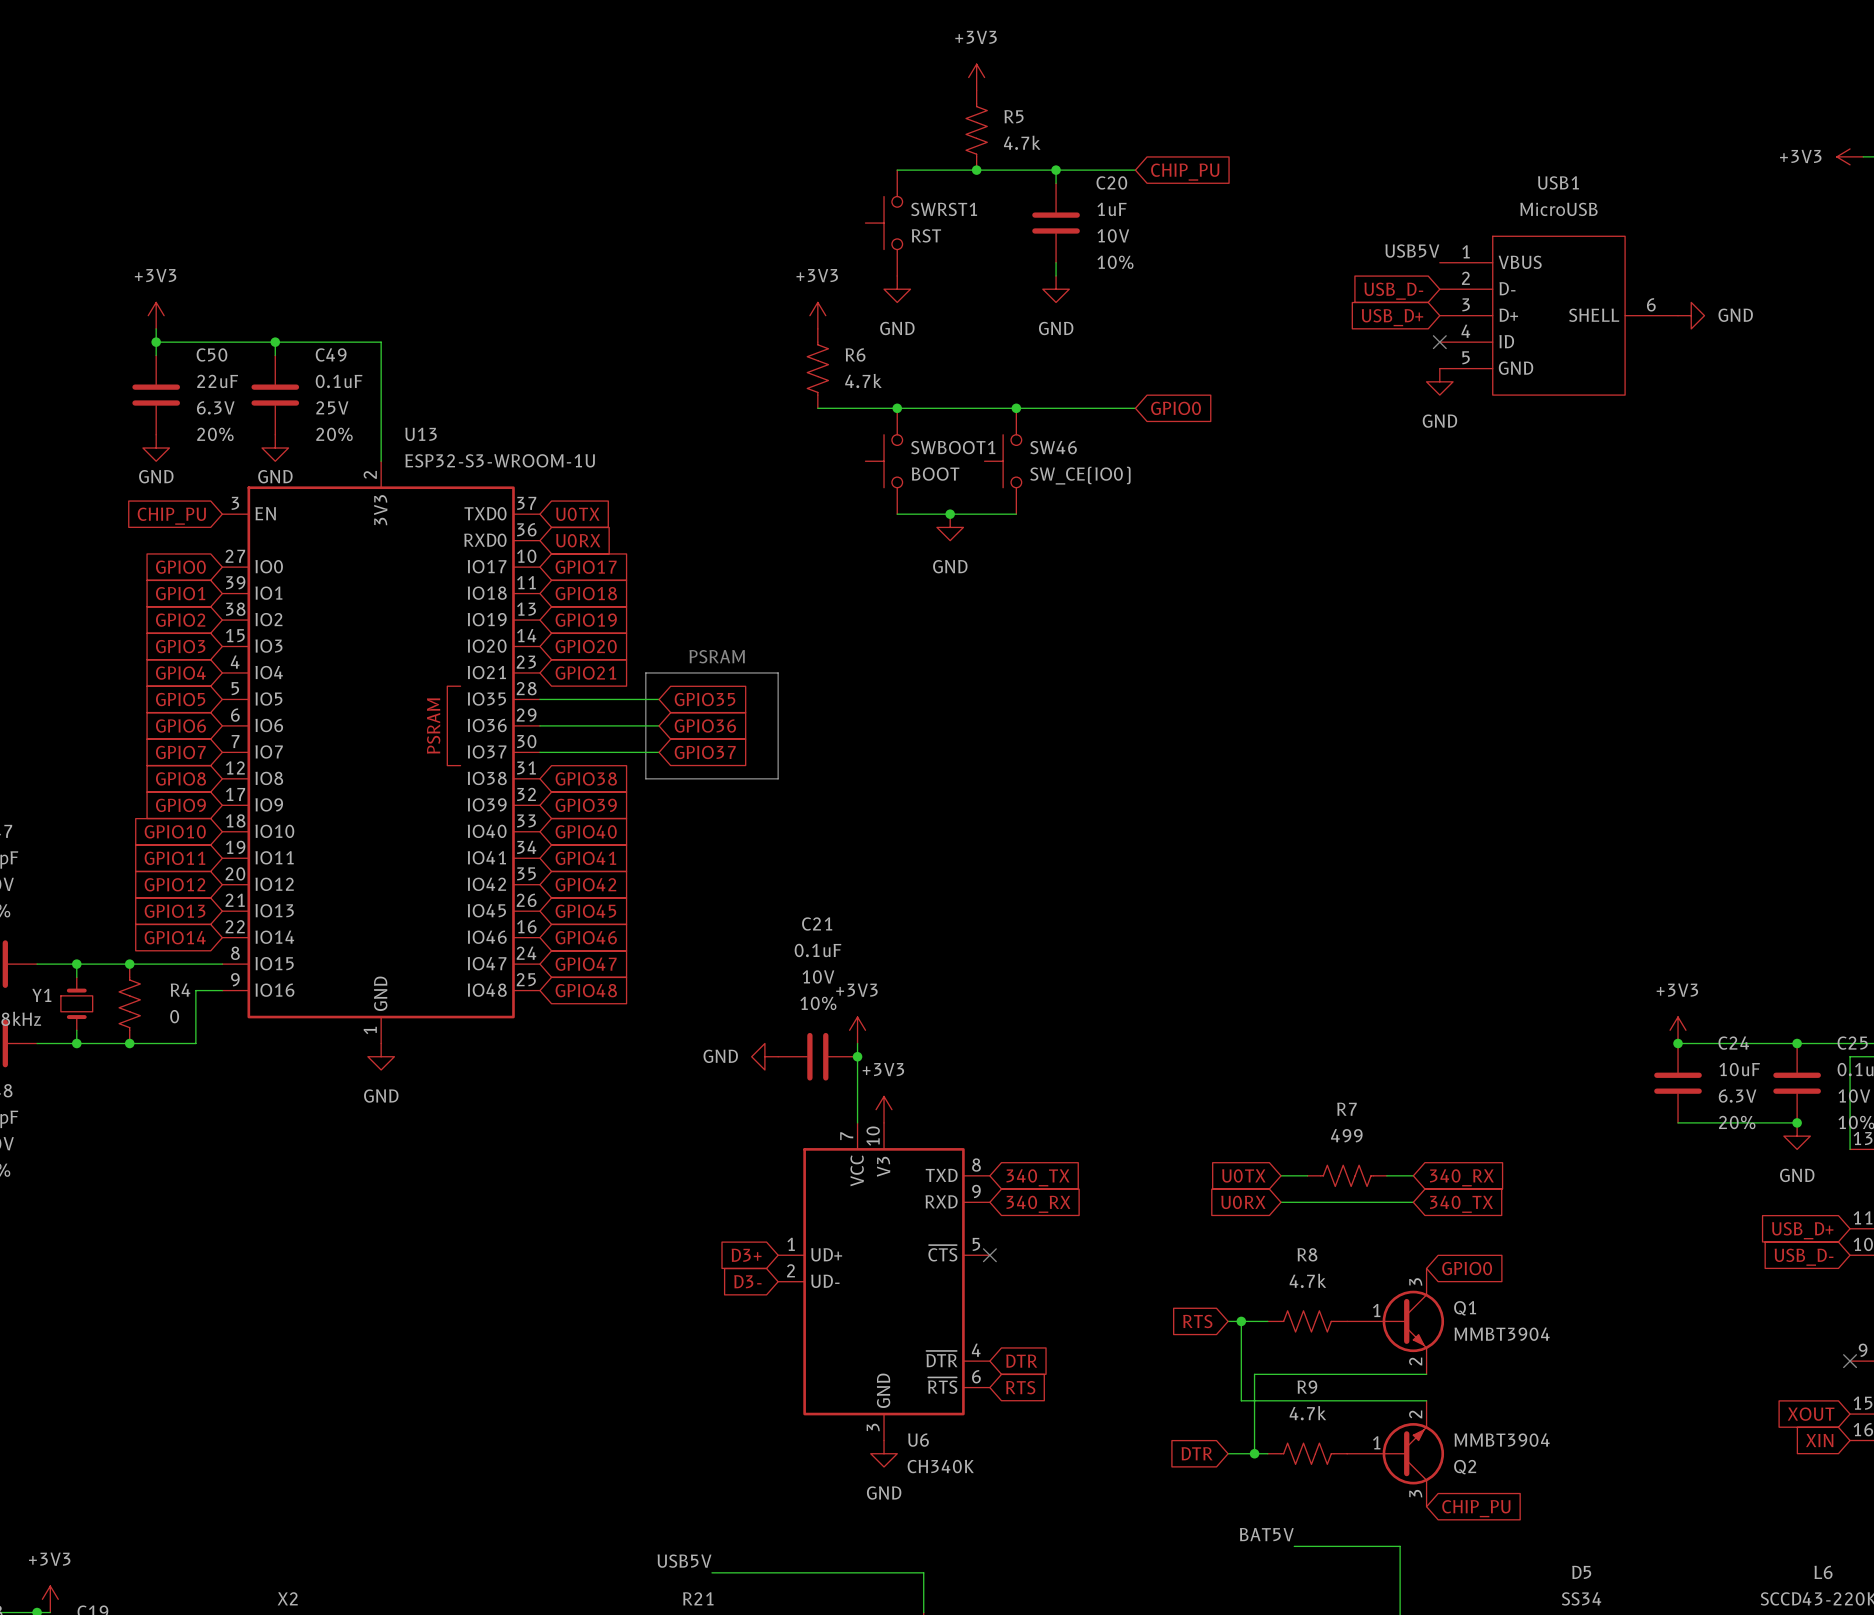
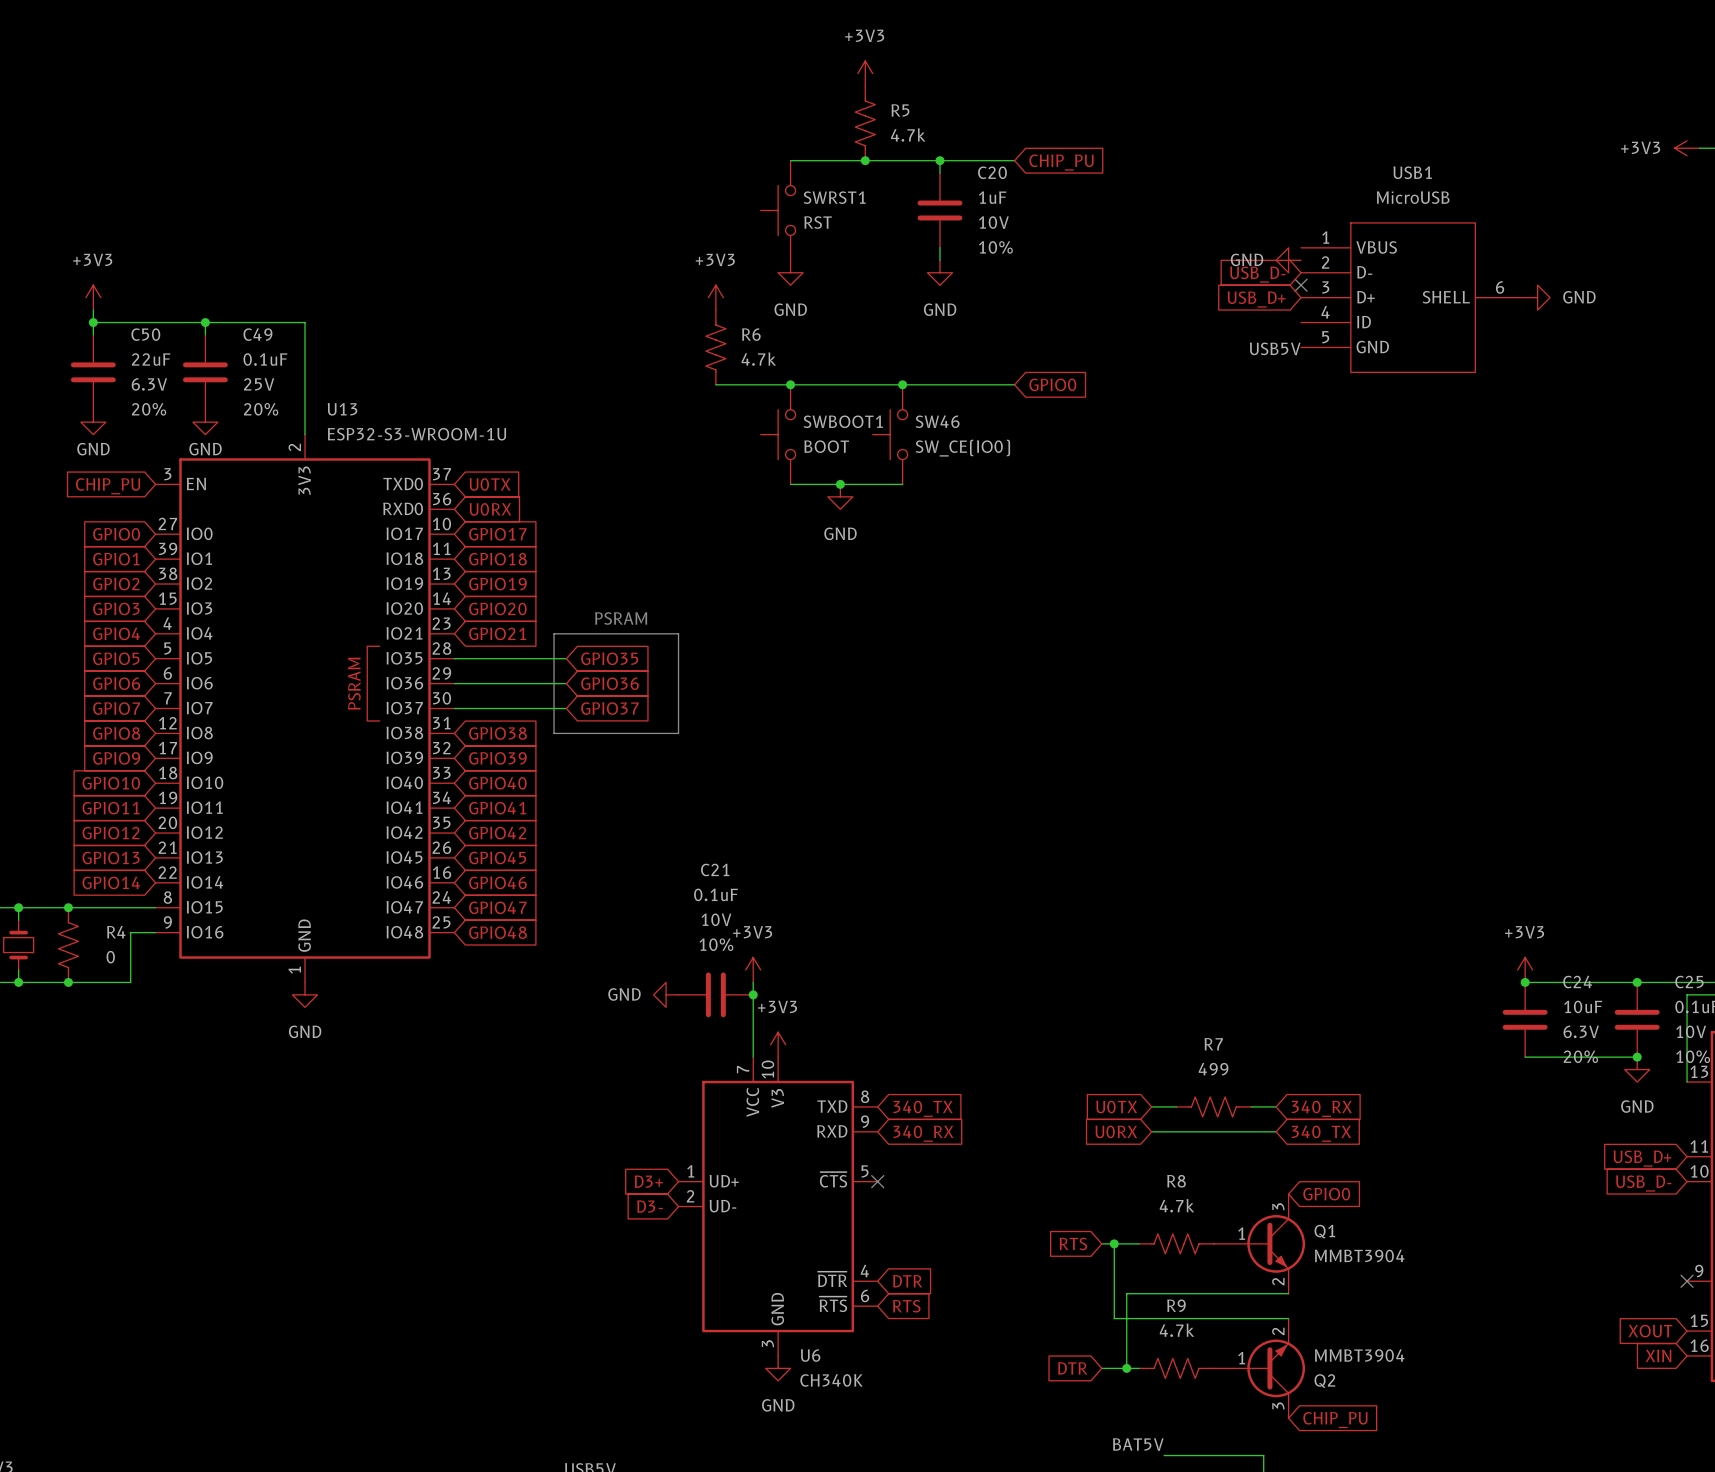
label position: USB5V (1412, 251) -> USB5V (1275, 348)
no-connect mark position: (1439, 342) -> (1301, 285)
power symbol rotation: 0° (1439, 381) -> 90° clockwise (1288, 260)
power symbol position: GND (1439, 381) -> GND (1288, 260)

